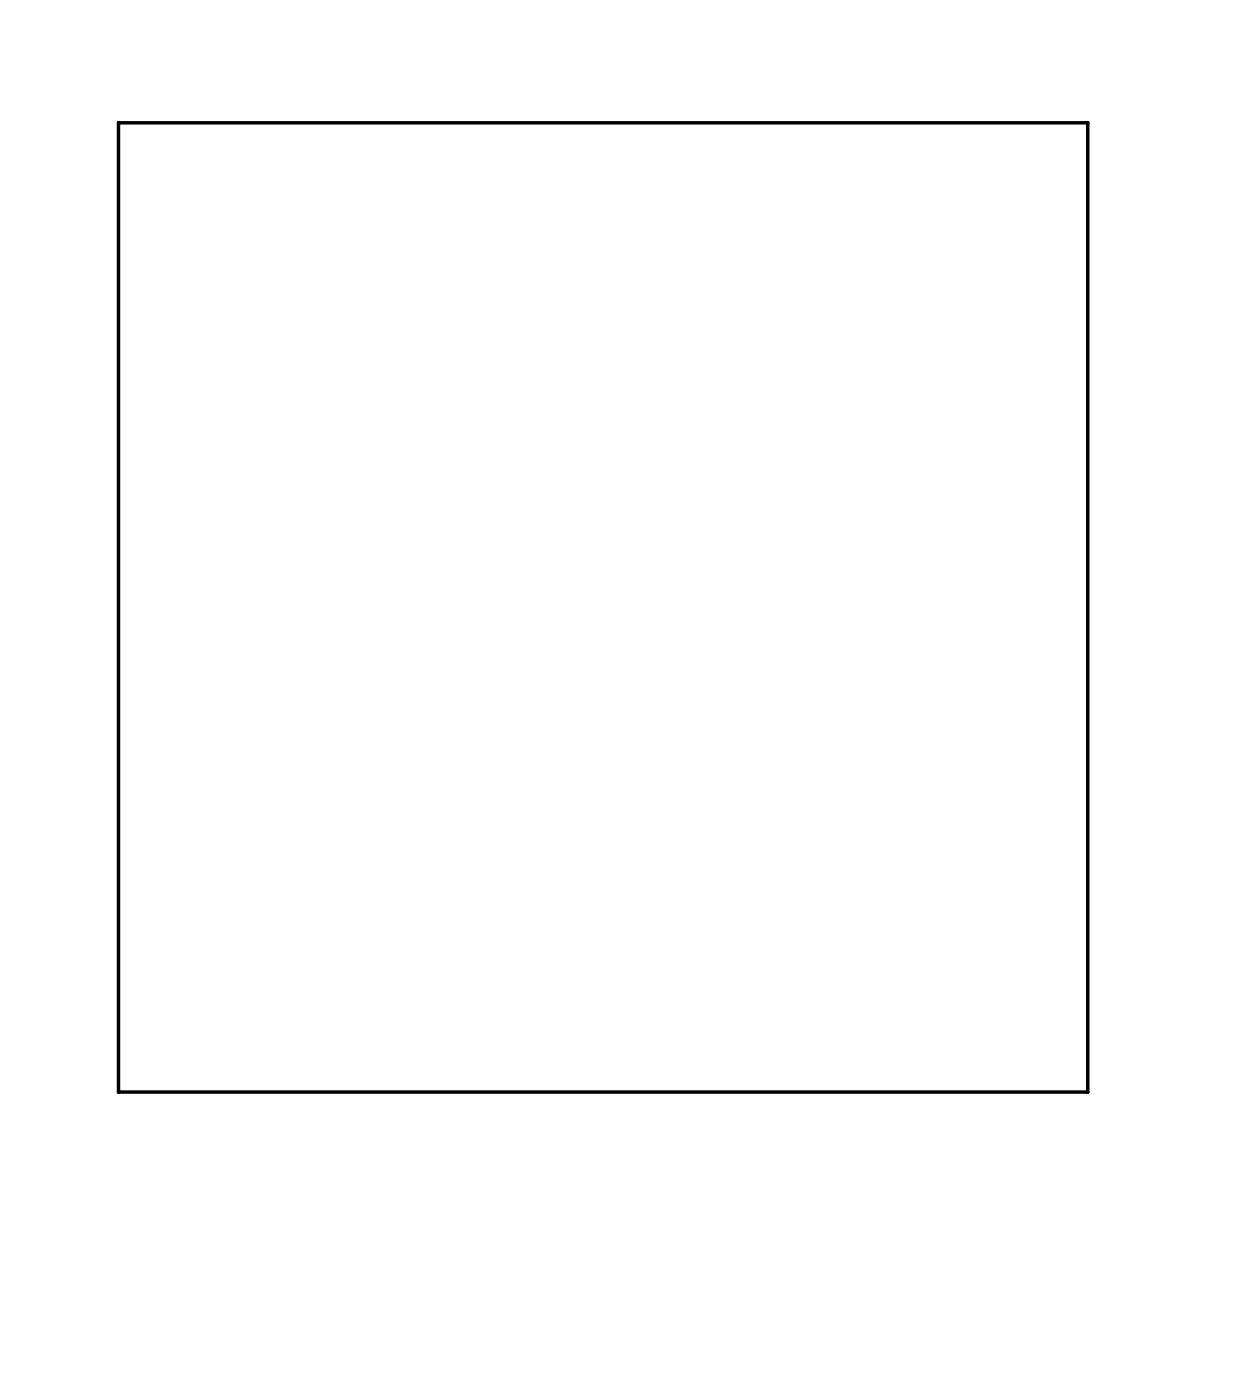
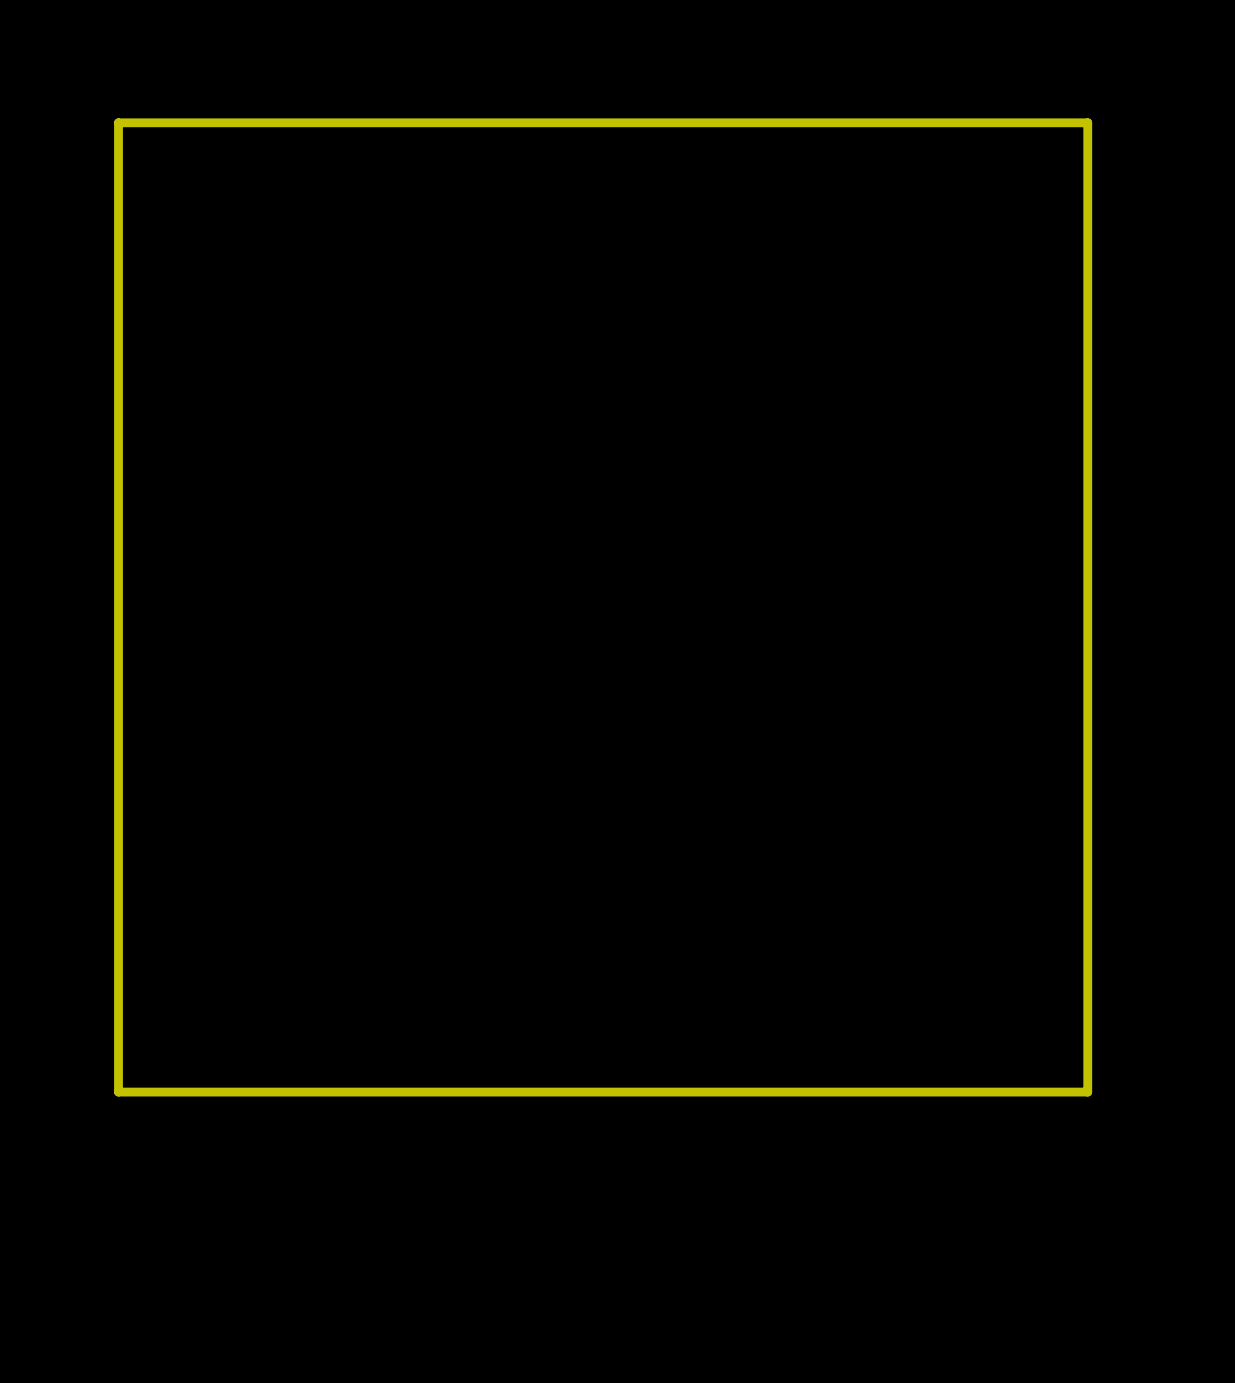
board edge width: thin (1087, 122) (1087, 1092) (118, 1092) (118, 122) (1087, 122) -> thick (1087, 122) (1087, 1092) (118, 1092) (118, 122) (1087, 122)

